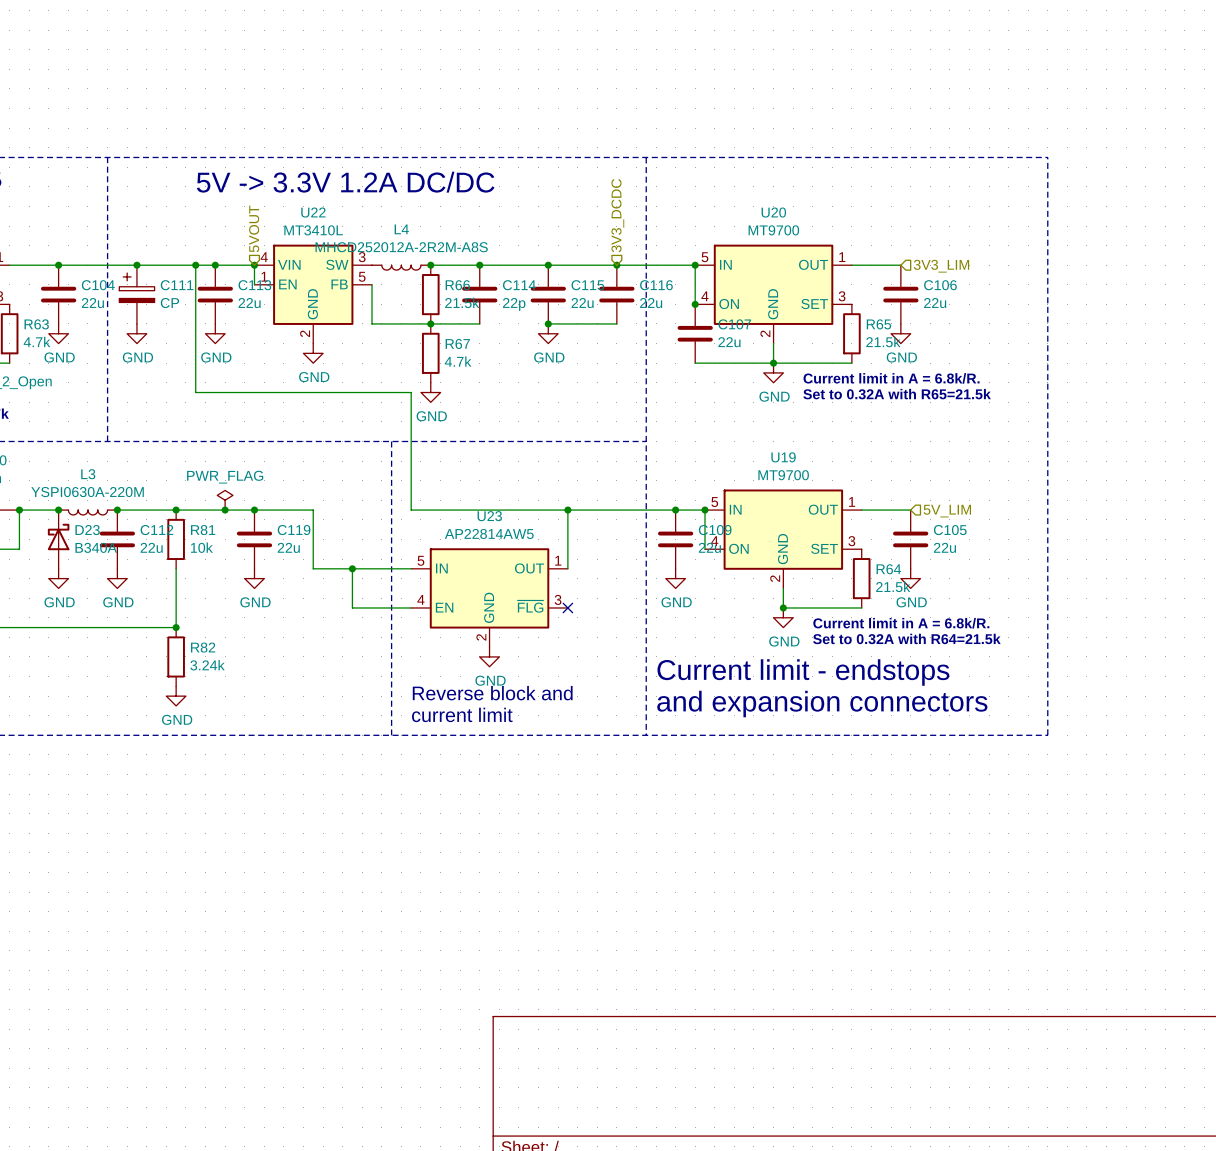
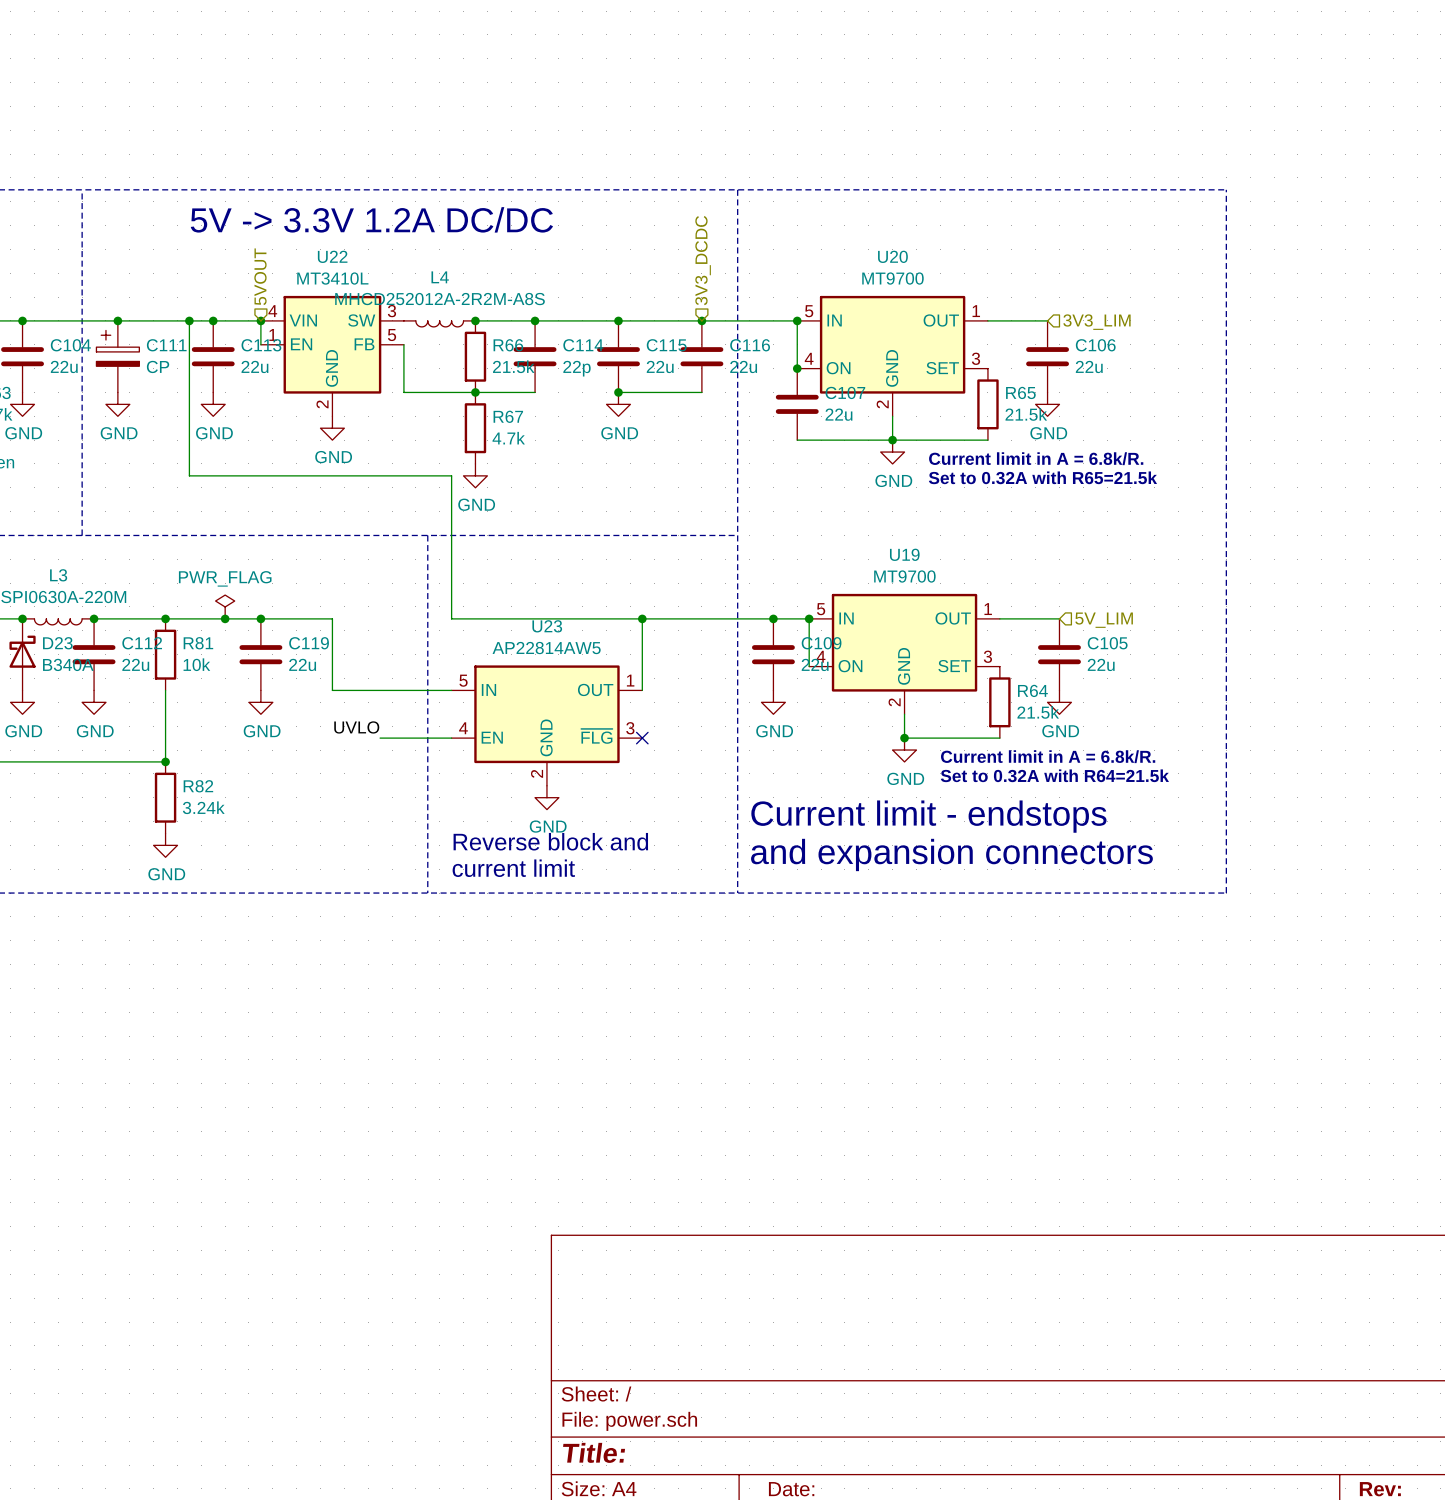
wire: (352, 568) (352, 607) -> none
junction: (352, 568) -> none
label: none -> UVLO (356, 727)

